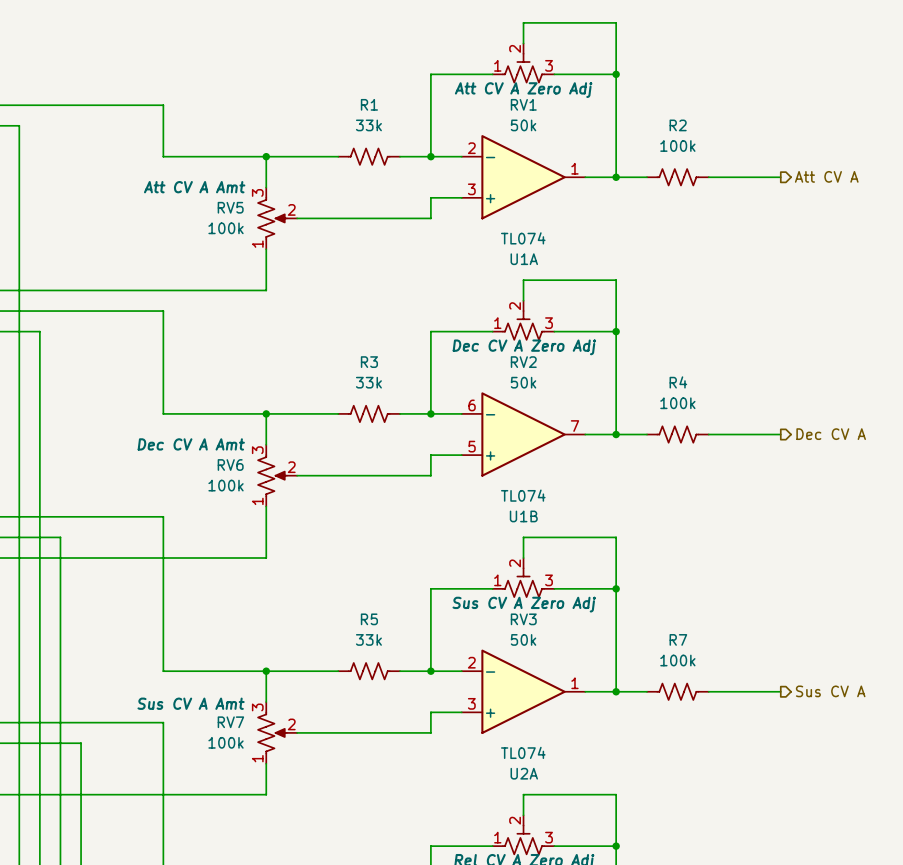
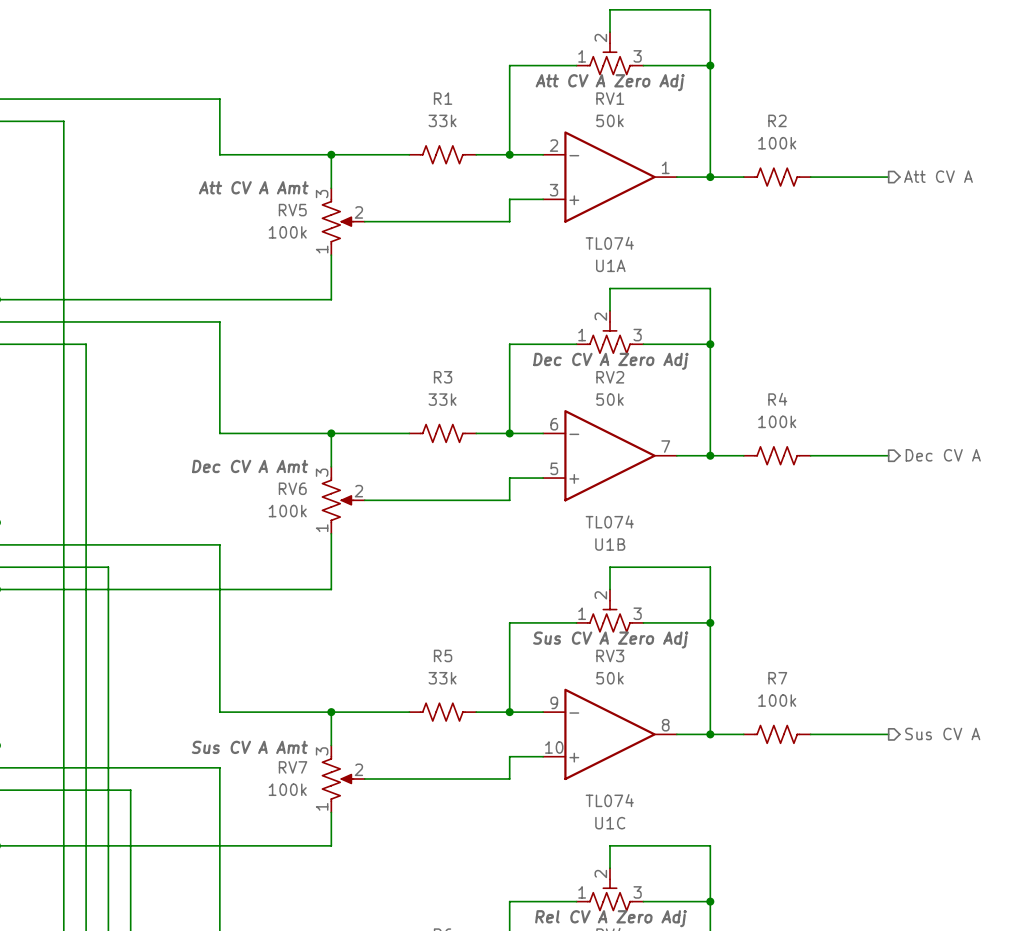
U2A pin number: 2 (471, 662) -> 9 (554, 702)
U2A pin number: 1 (574, 683) -> 8 (665, 725)
U2A pin number: 3 (471, 703) -> 10 (554, 747)
U2A name: U2A (524, 773) -> U1C (610, 823)

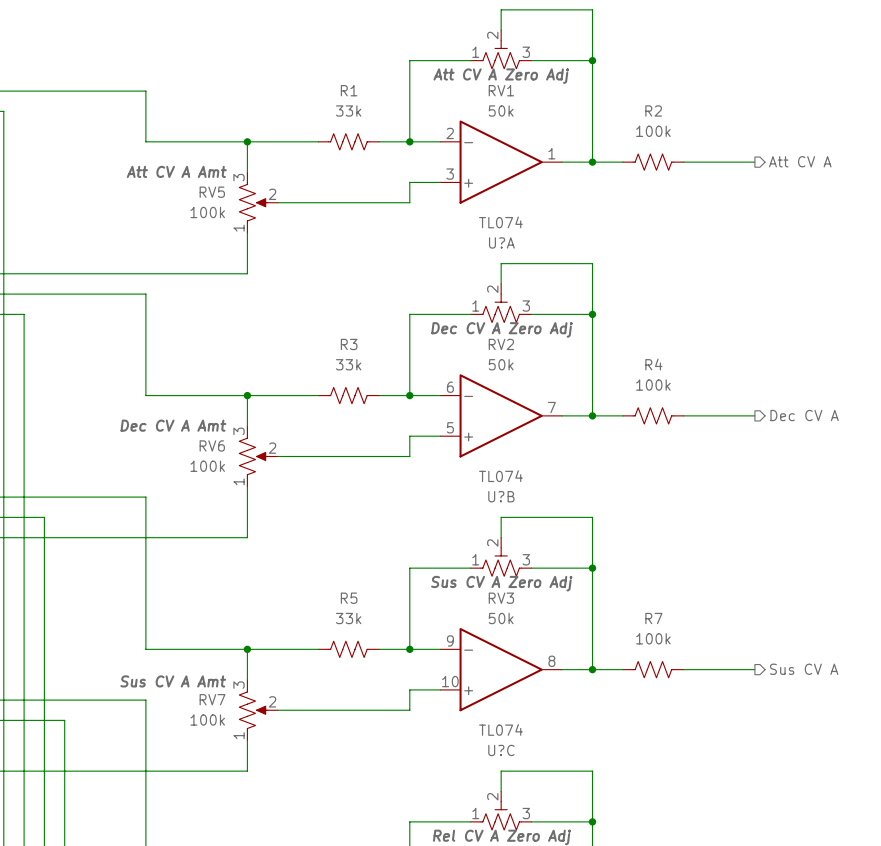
U1A name: U1A (610, 265) -> U?A (501, 242)
U1B name: U1B (610, 544) -> U?B (501, 496)
U1C name: U1C (610, 823) -> U?C (501, 750)

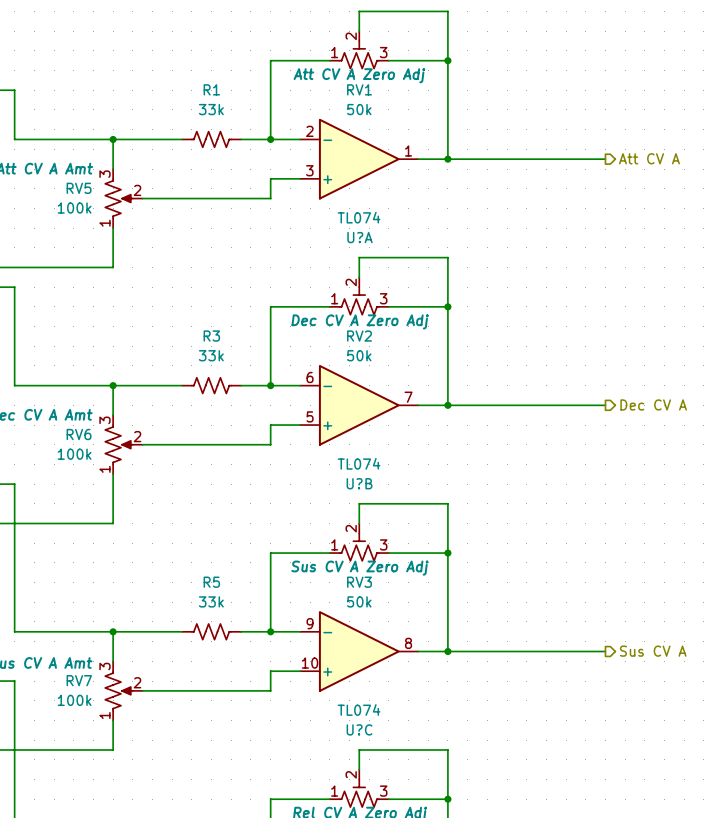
R2: 100k (653, 162) -> none
R4: 100k (653, 415) -> none
R7: 100k (653, 669) -> none

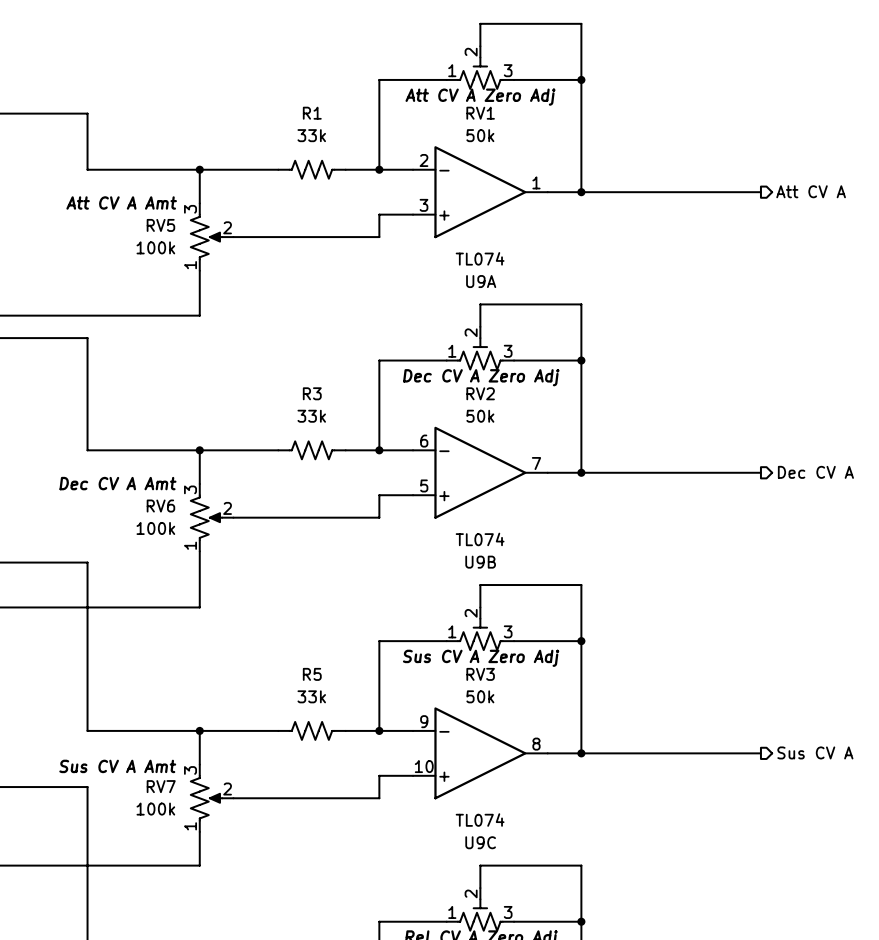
U?A name: U?A (359, 237) -> U9A (481, 281)
U?B name: U?B (359, 483) -> U9B (480, 562)
U?C name: U?C (359, 729) -> U9C (480, 842)

